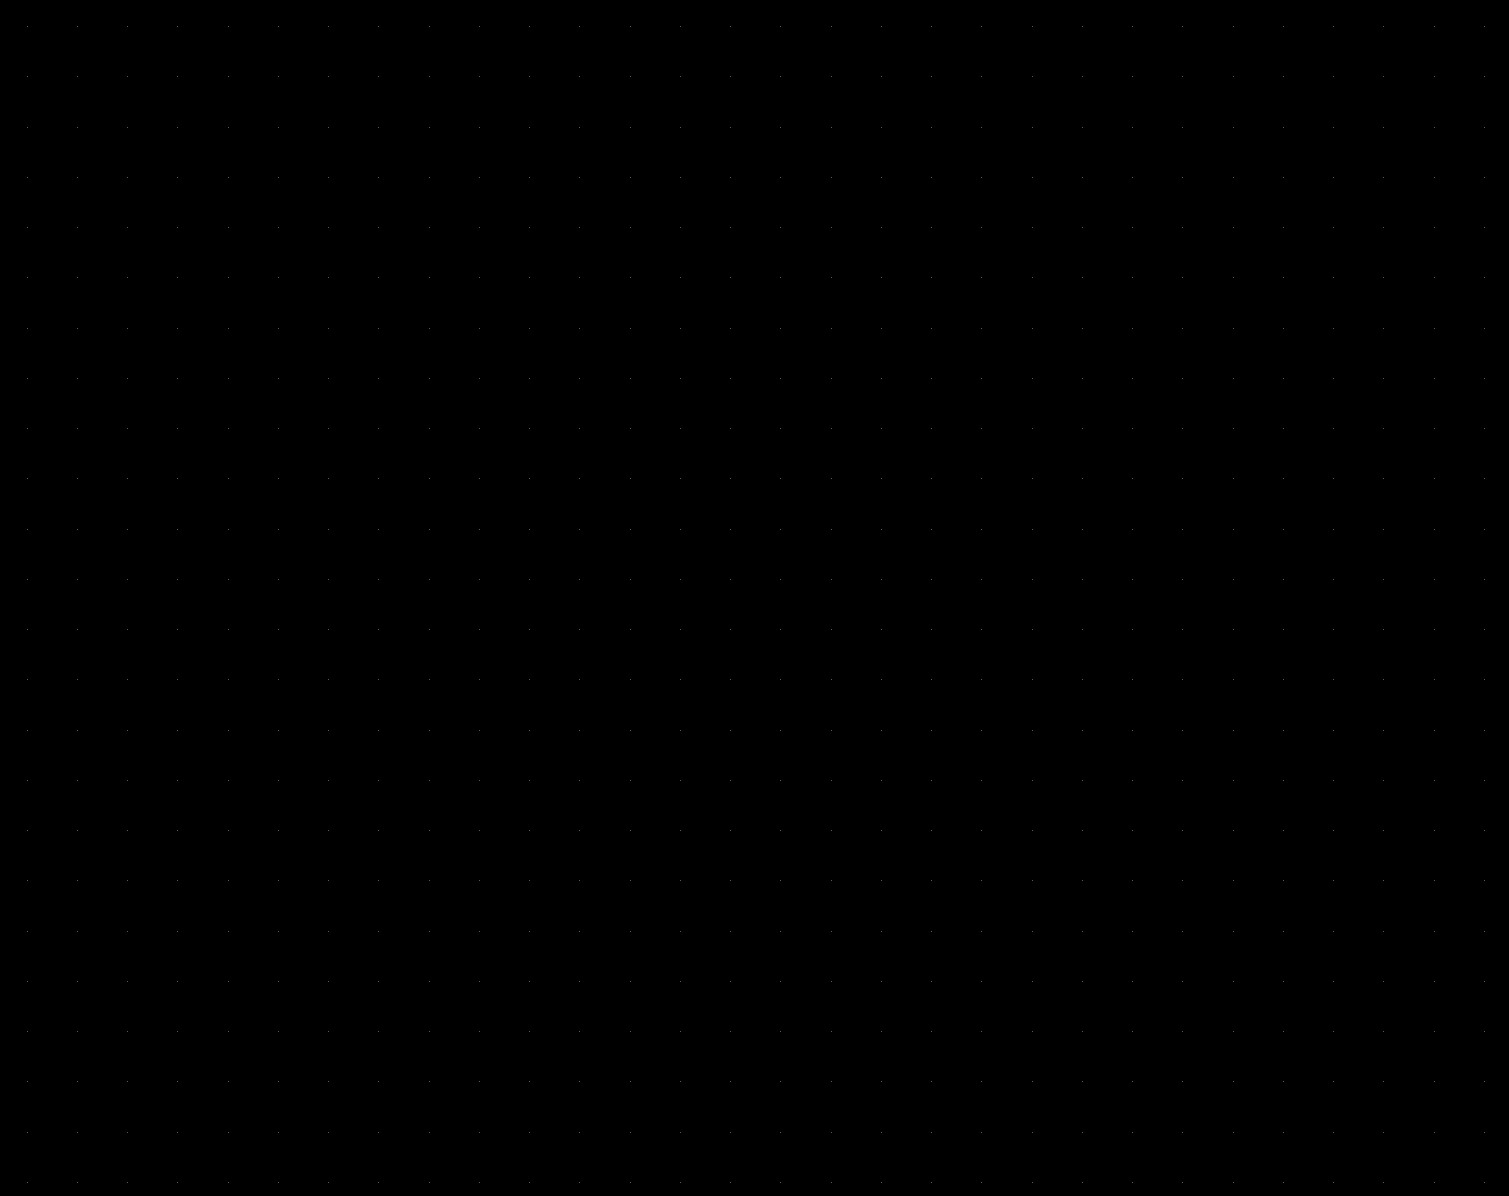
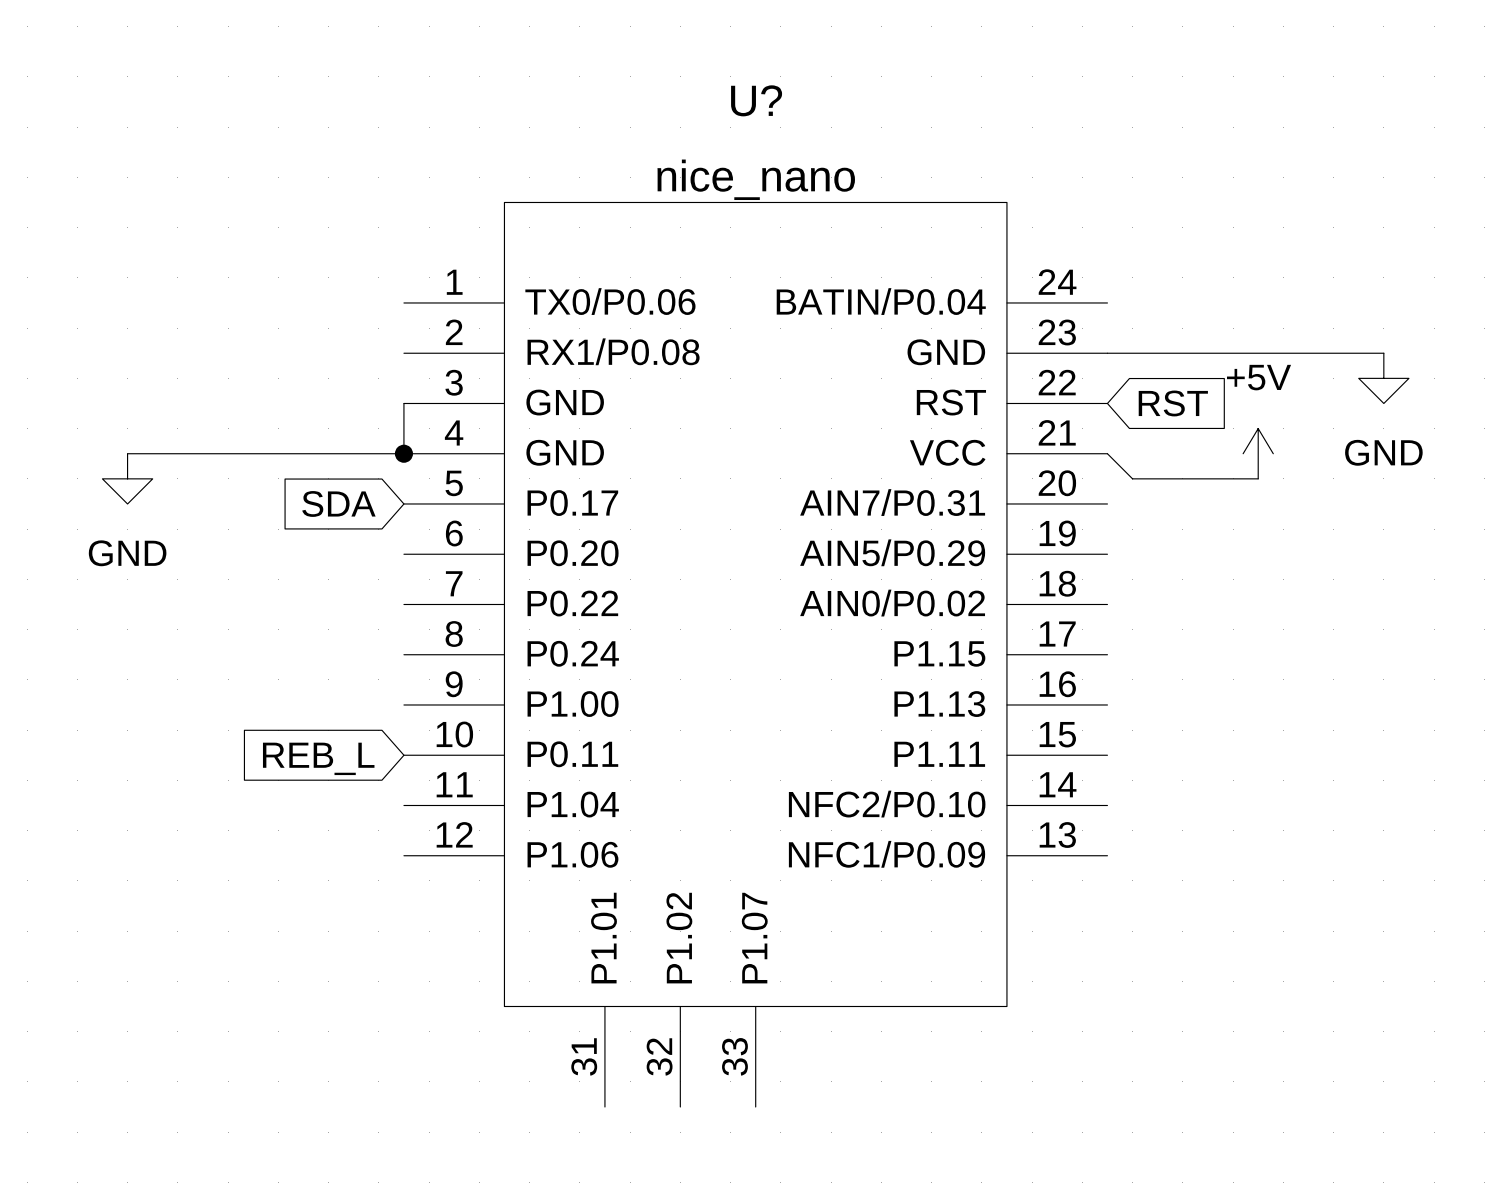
wire: none -> (1107, 353) (1383, 353)
power symbol: none -> GND (1383, 378)
wire: none -> (403, 403) (403, 453) (127, 453)
global label: none -> RST (1173, 403)
junction: none -> (403, 453)
wire: none -> (1107, 453) (1132, 478) (1258, 478)
power symbol: none -> +5V (1258, 453)
power symbol: none -> GND (127, 478)
global label: none -> SDA (338, 503)
U?: none -> nice_nano (755, 654)
global label: none -> REB_L (318, 758)

